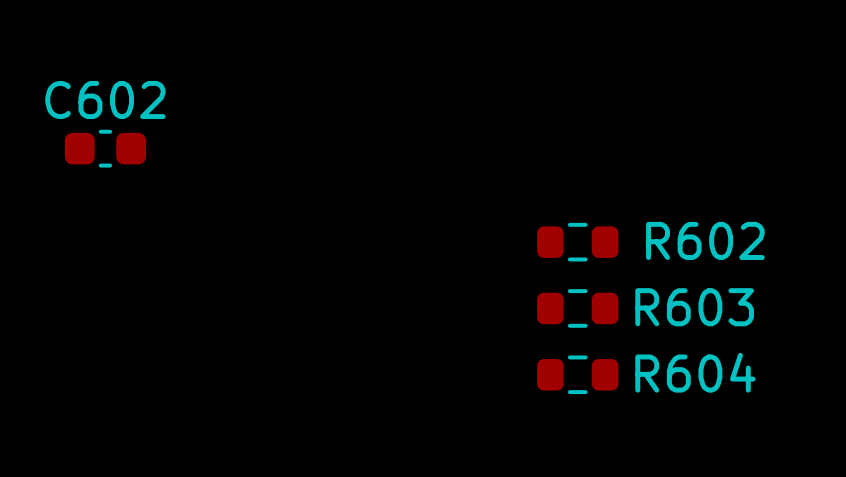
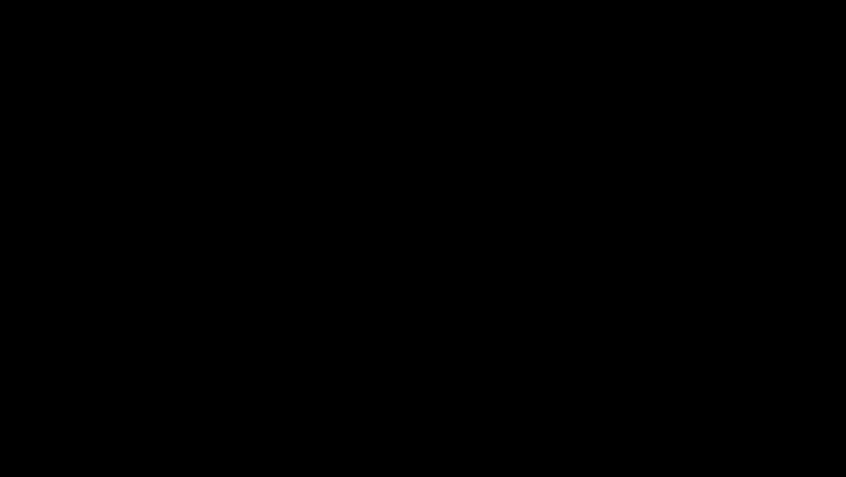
C602: (105, 148) -> none
R602: (577, 242) -> none
R603: (577, 308) -> none
R604: (577, 374) -> none

